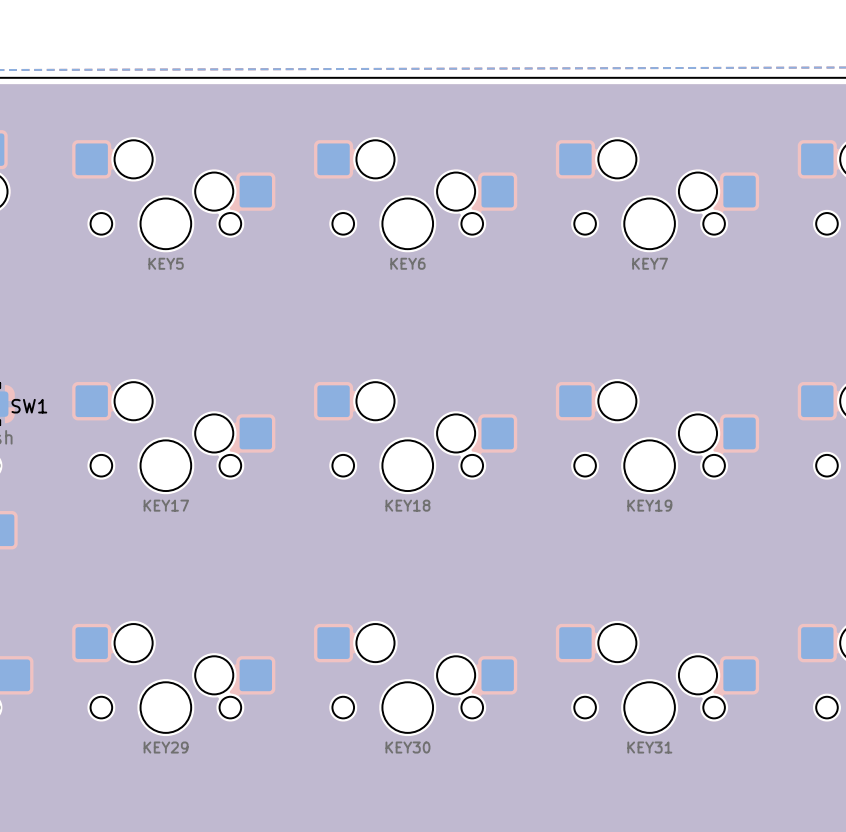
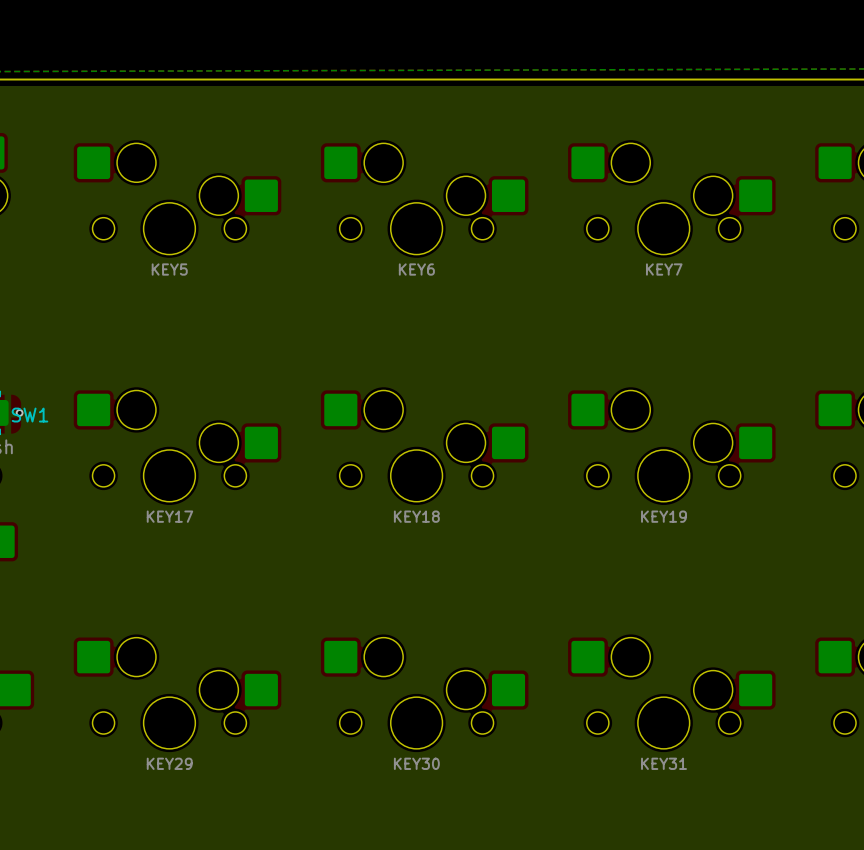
via: none -> (19, 412)

